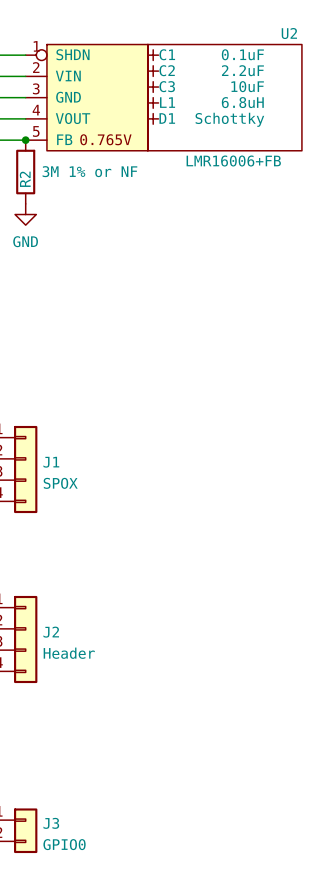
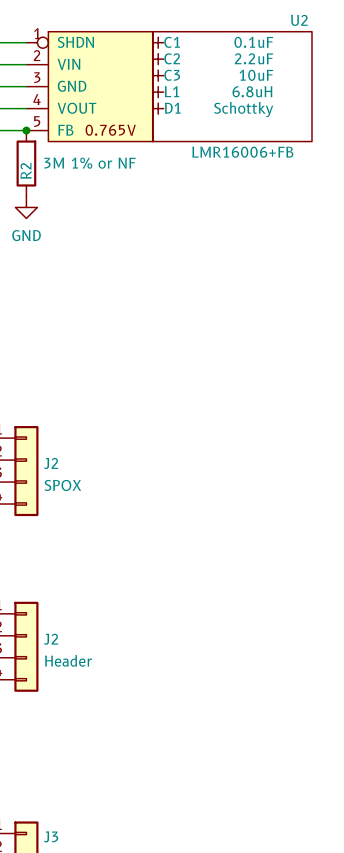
J1 name: J1 (51, 462) -> J2 (51, 463)

